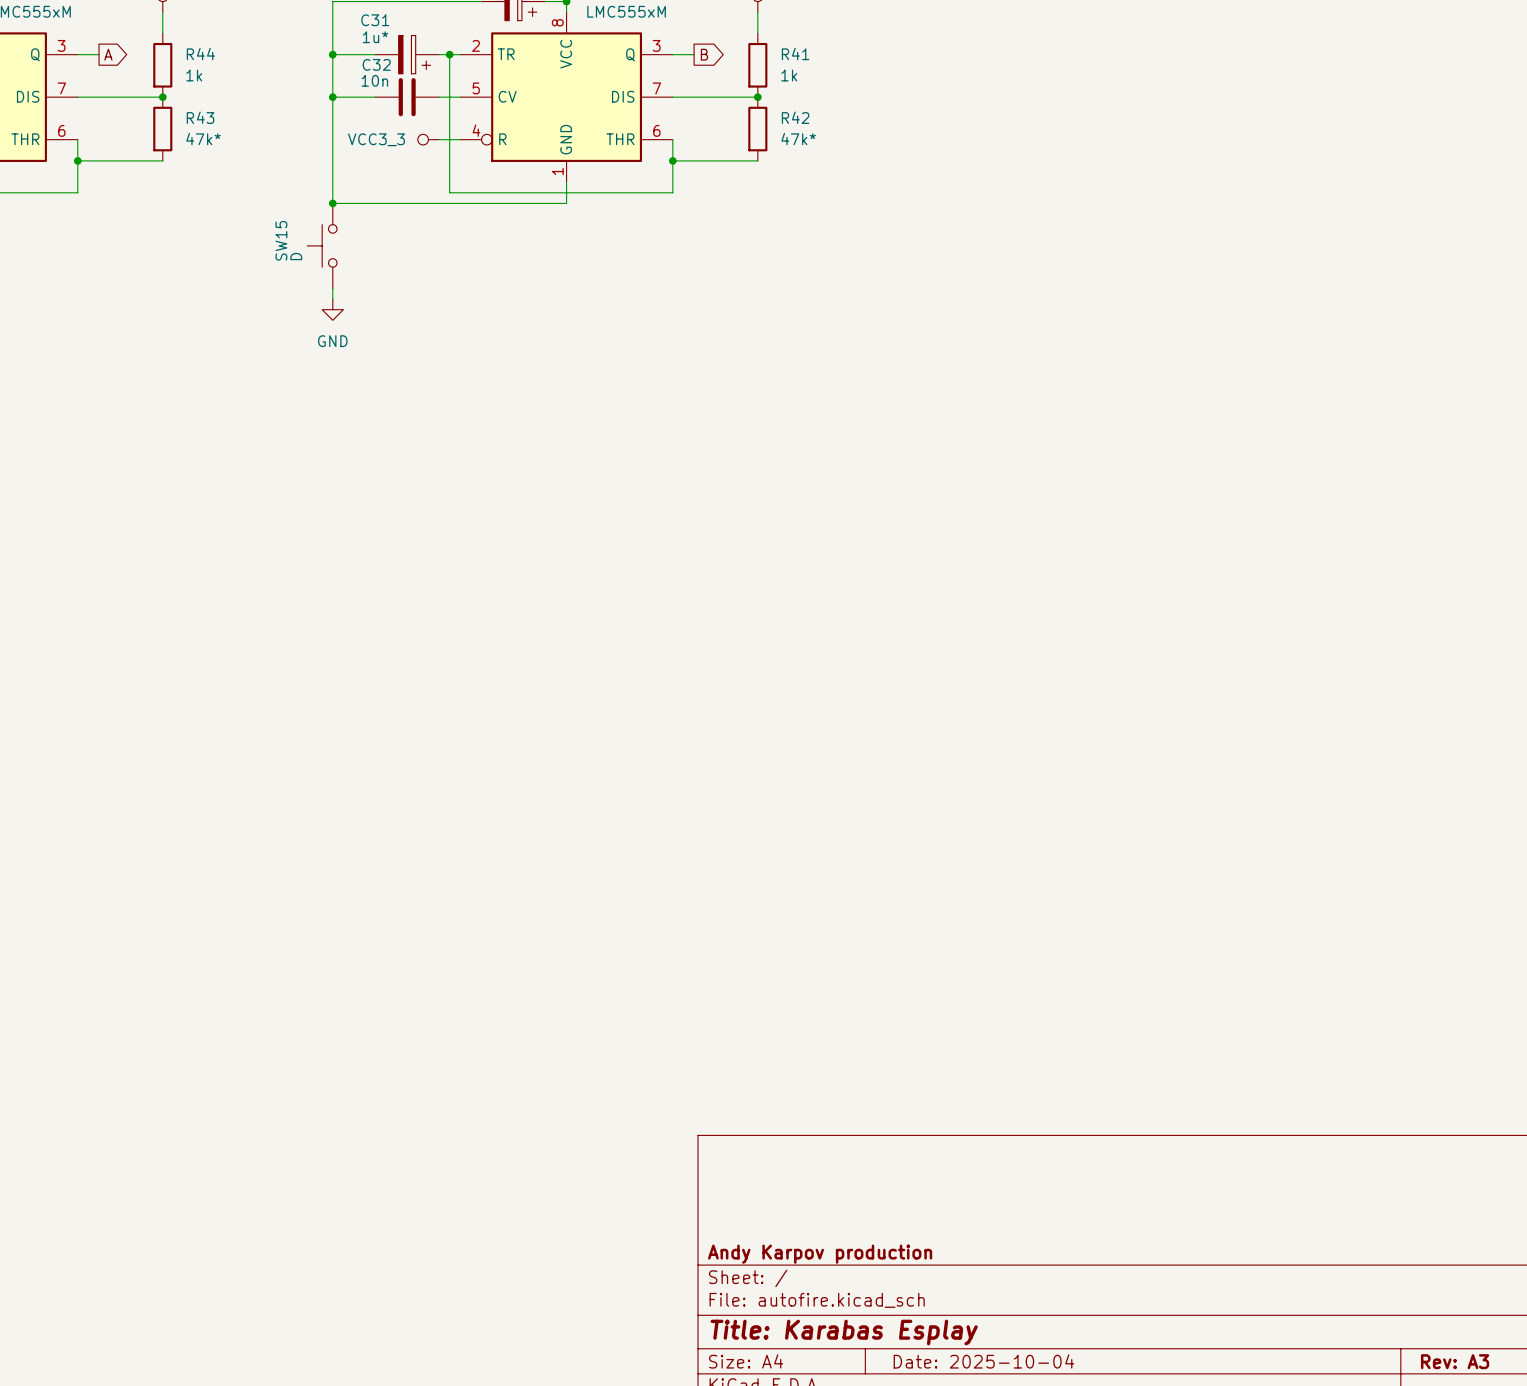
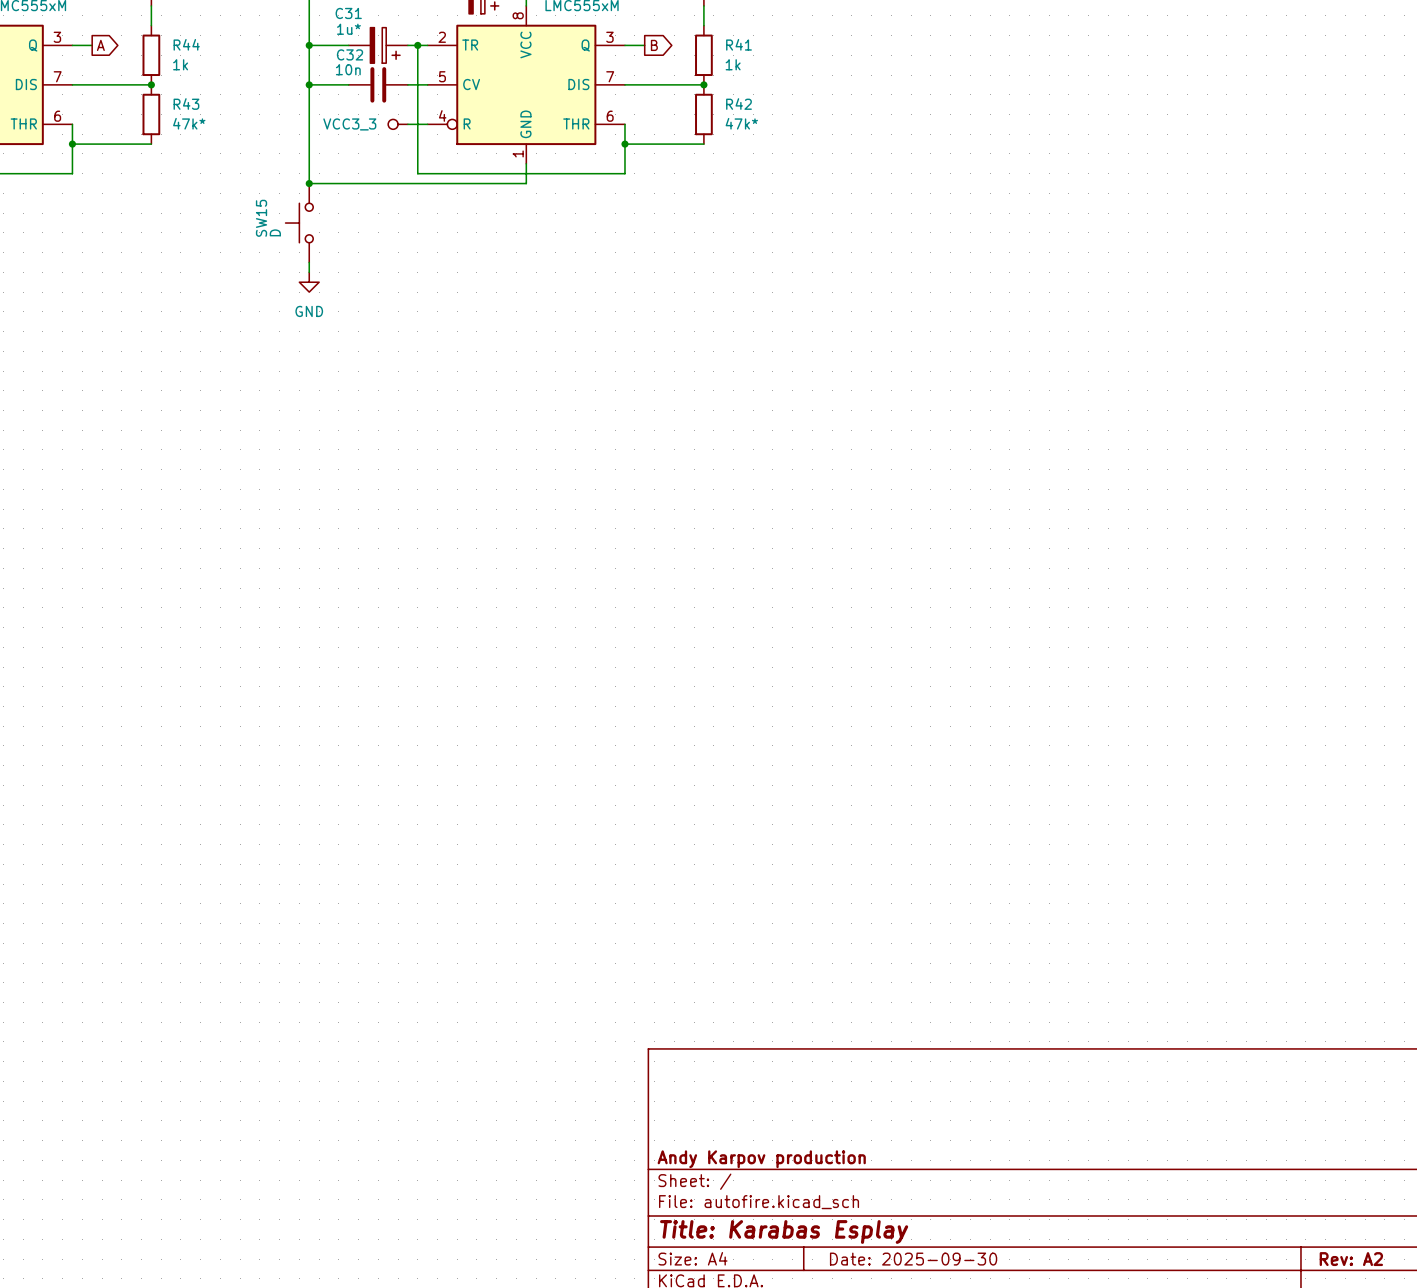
title block: Date: 2025-10-04 (983, 1361) -> Date: 2025-09-30 (913, 1259)
title block: Rev: A3 (1455, 1361) -> Rev: A2 (1351, 1259)

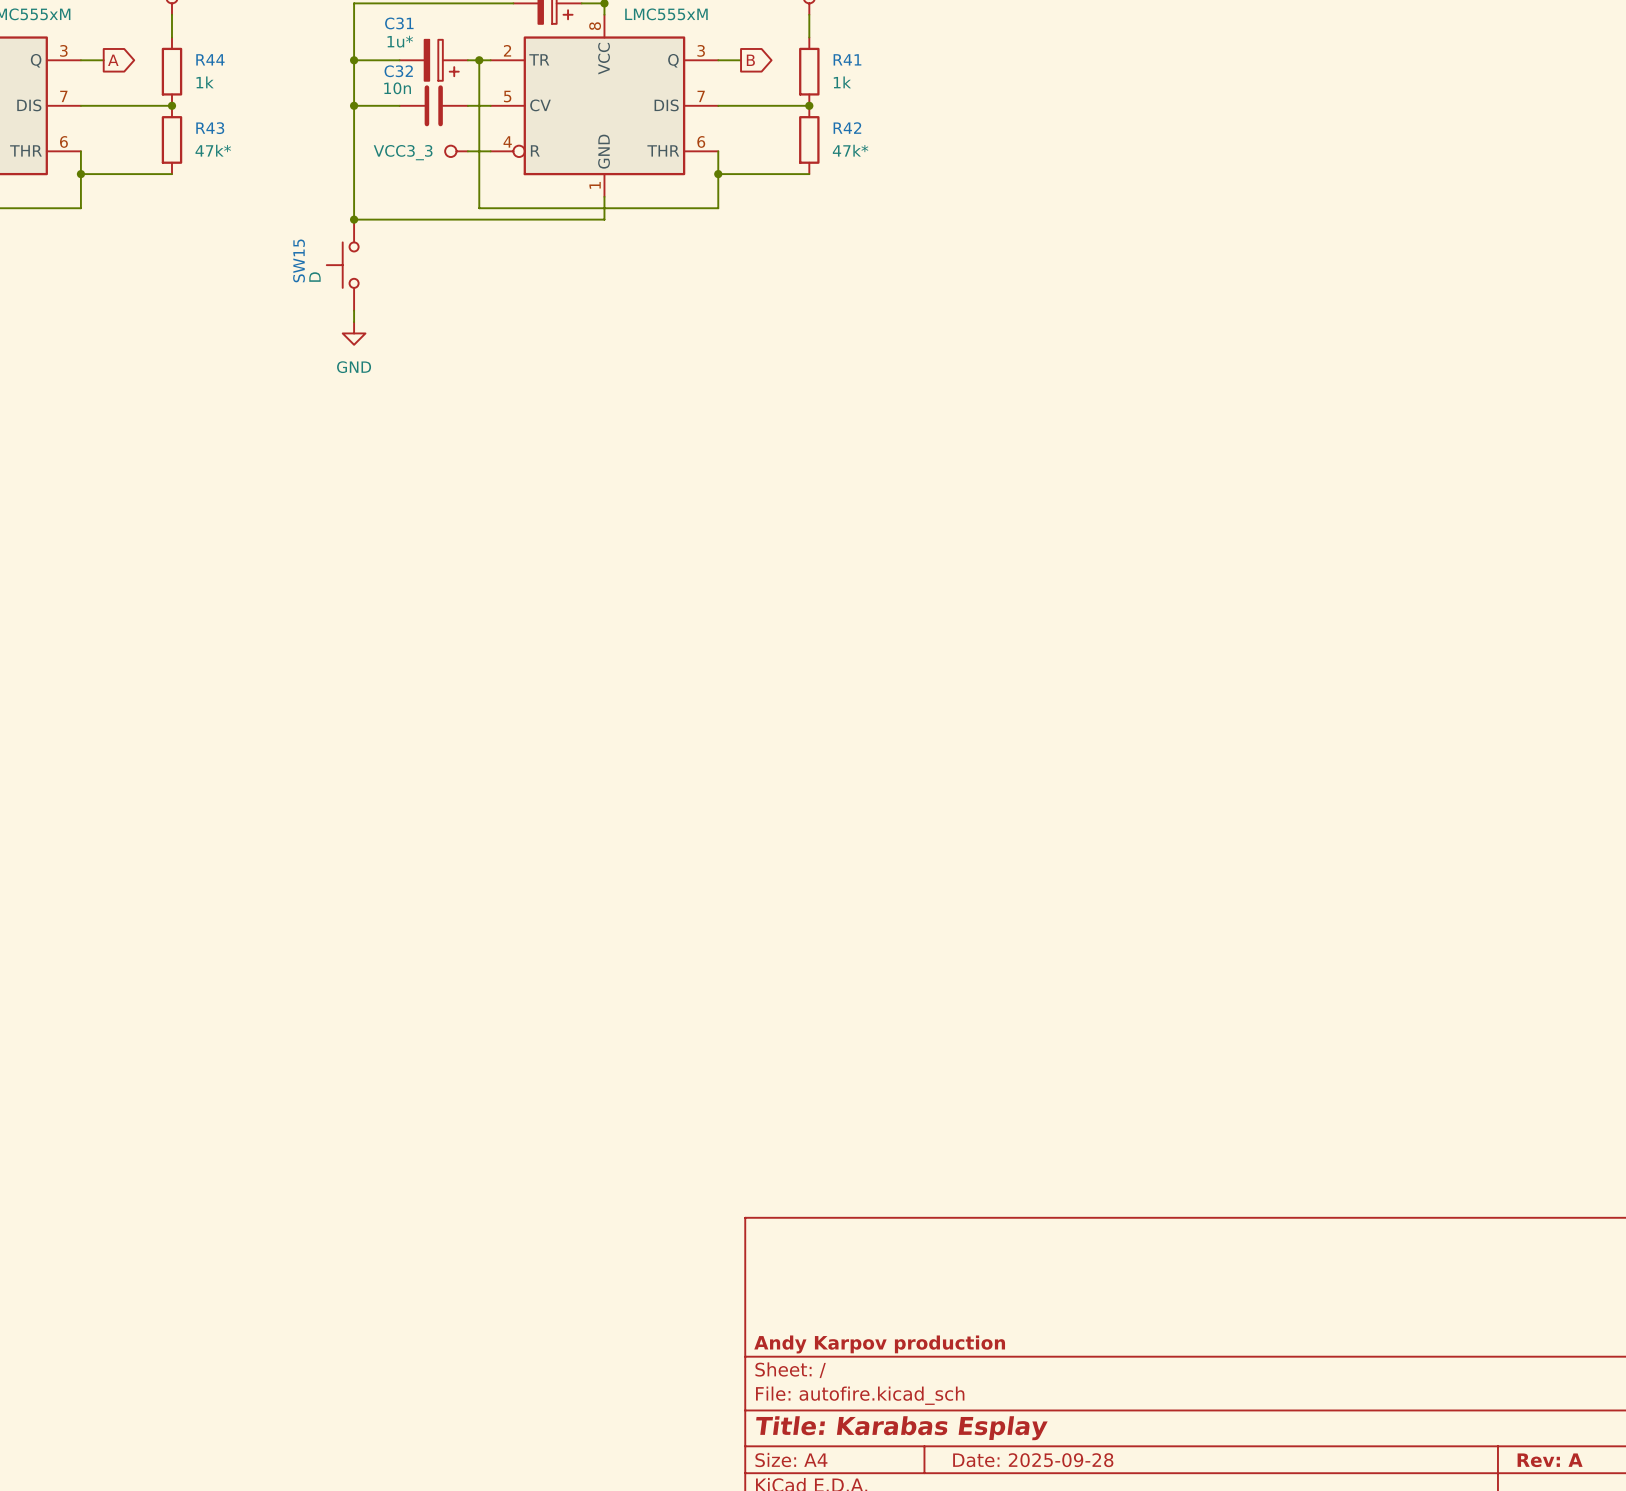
title block: Date: 2025-09-30 (913, 1259) -> Date: 2025-09-28 (1033, 1460)
title block: Rev: A2 (1351, 1259) -> Rev: A (1550, 1460)

